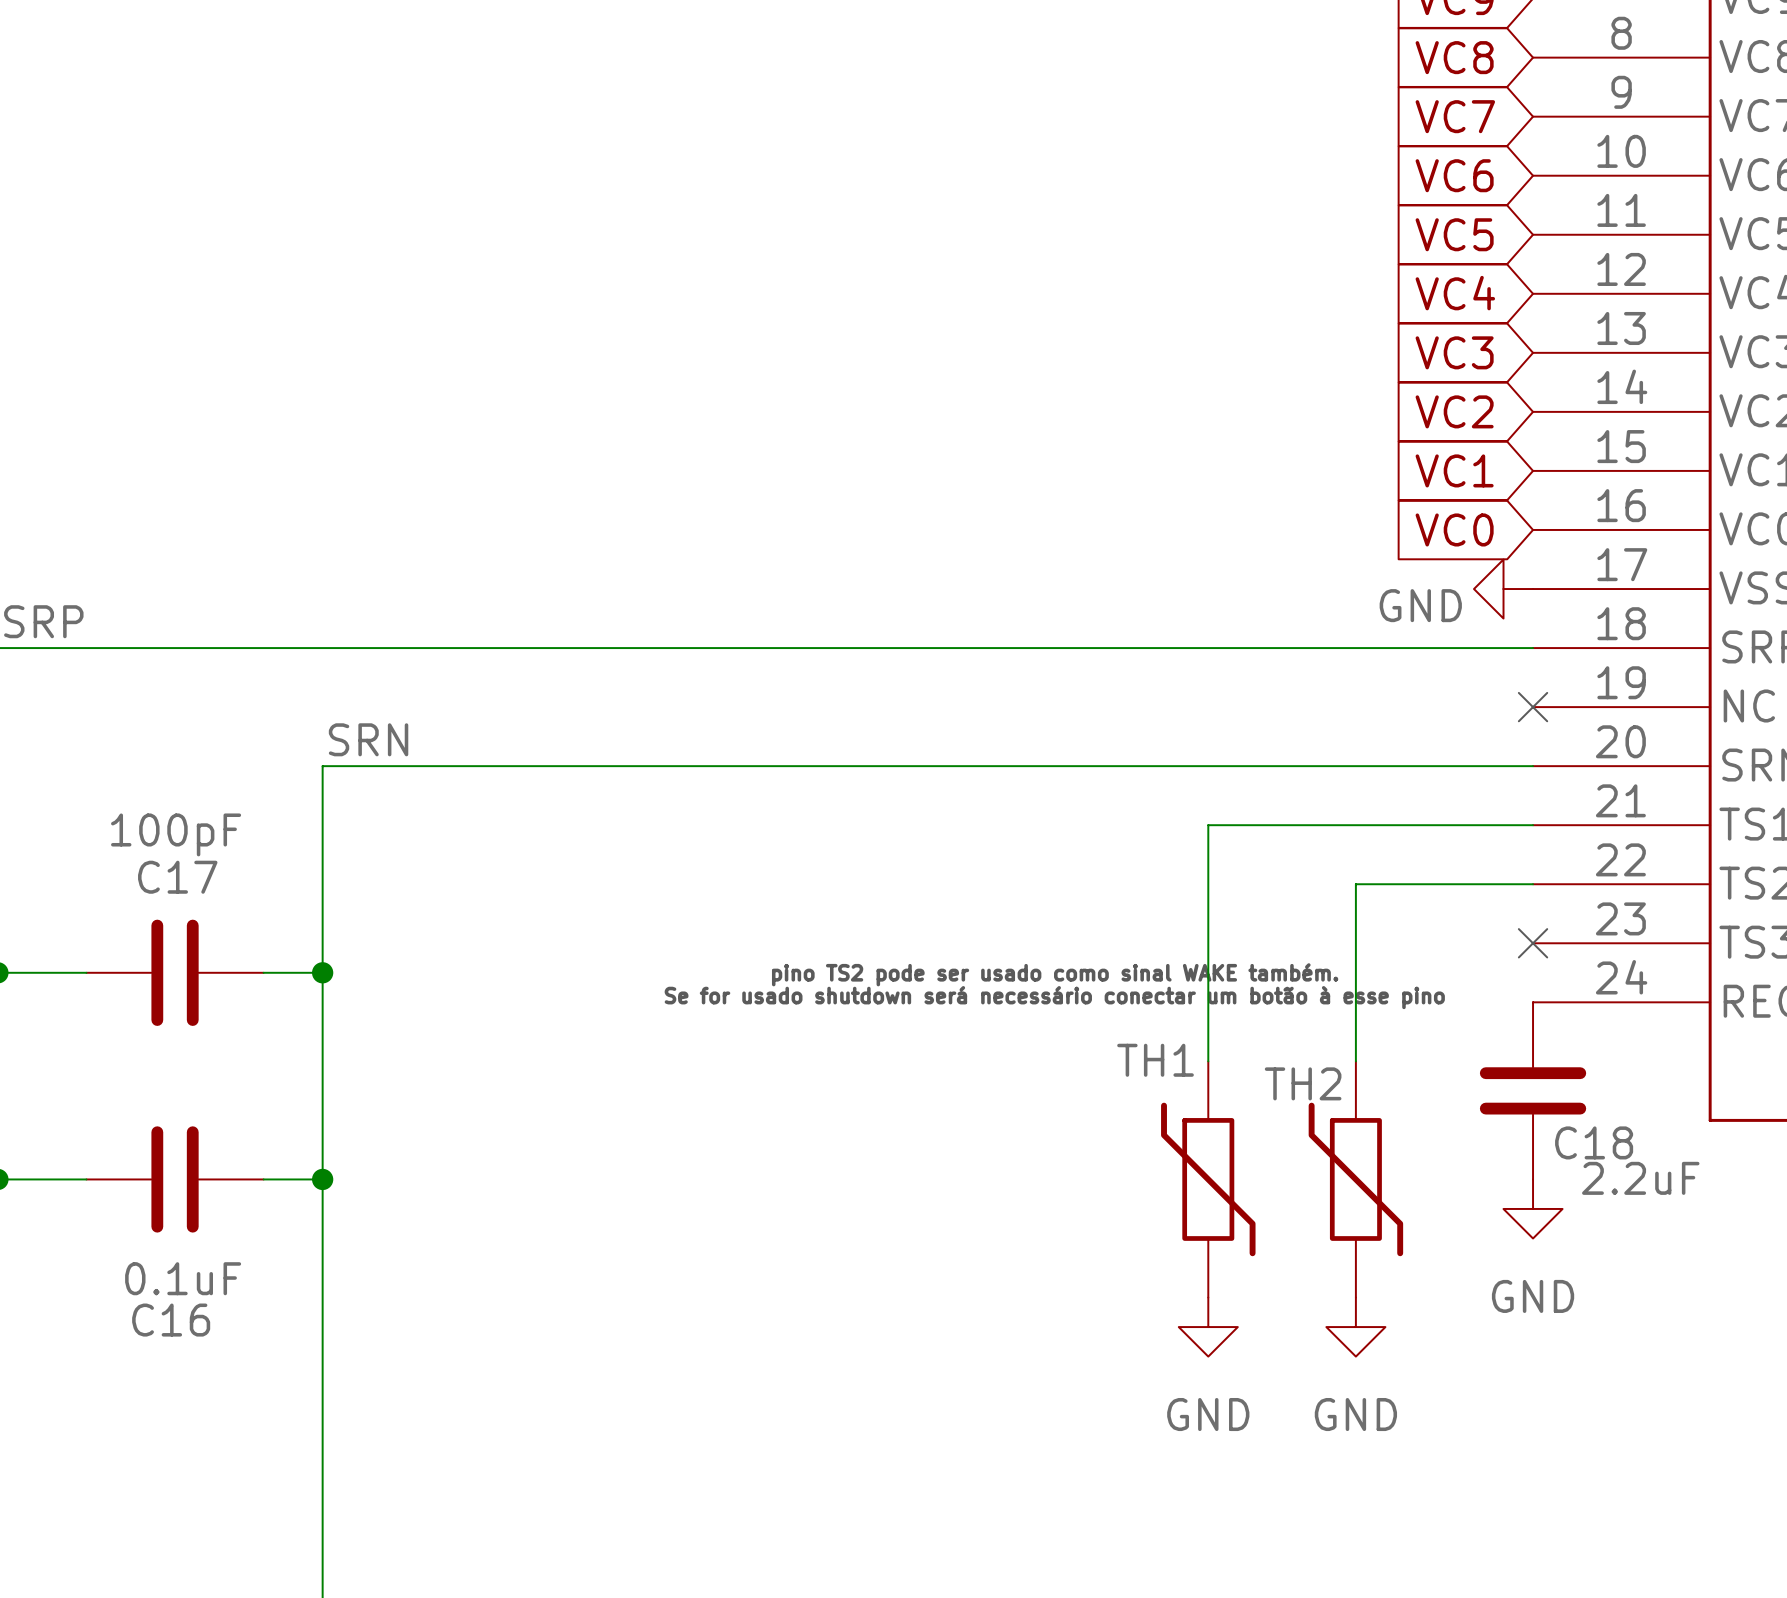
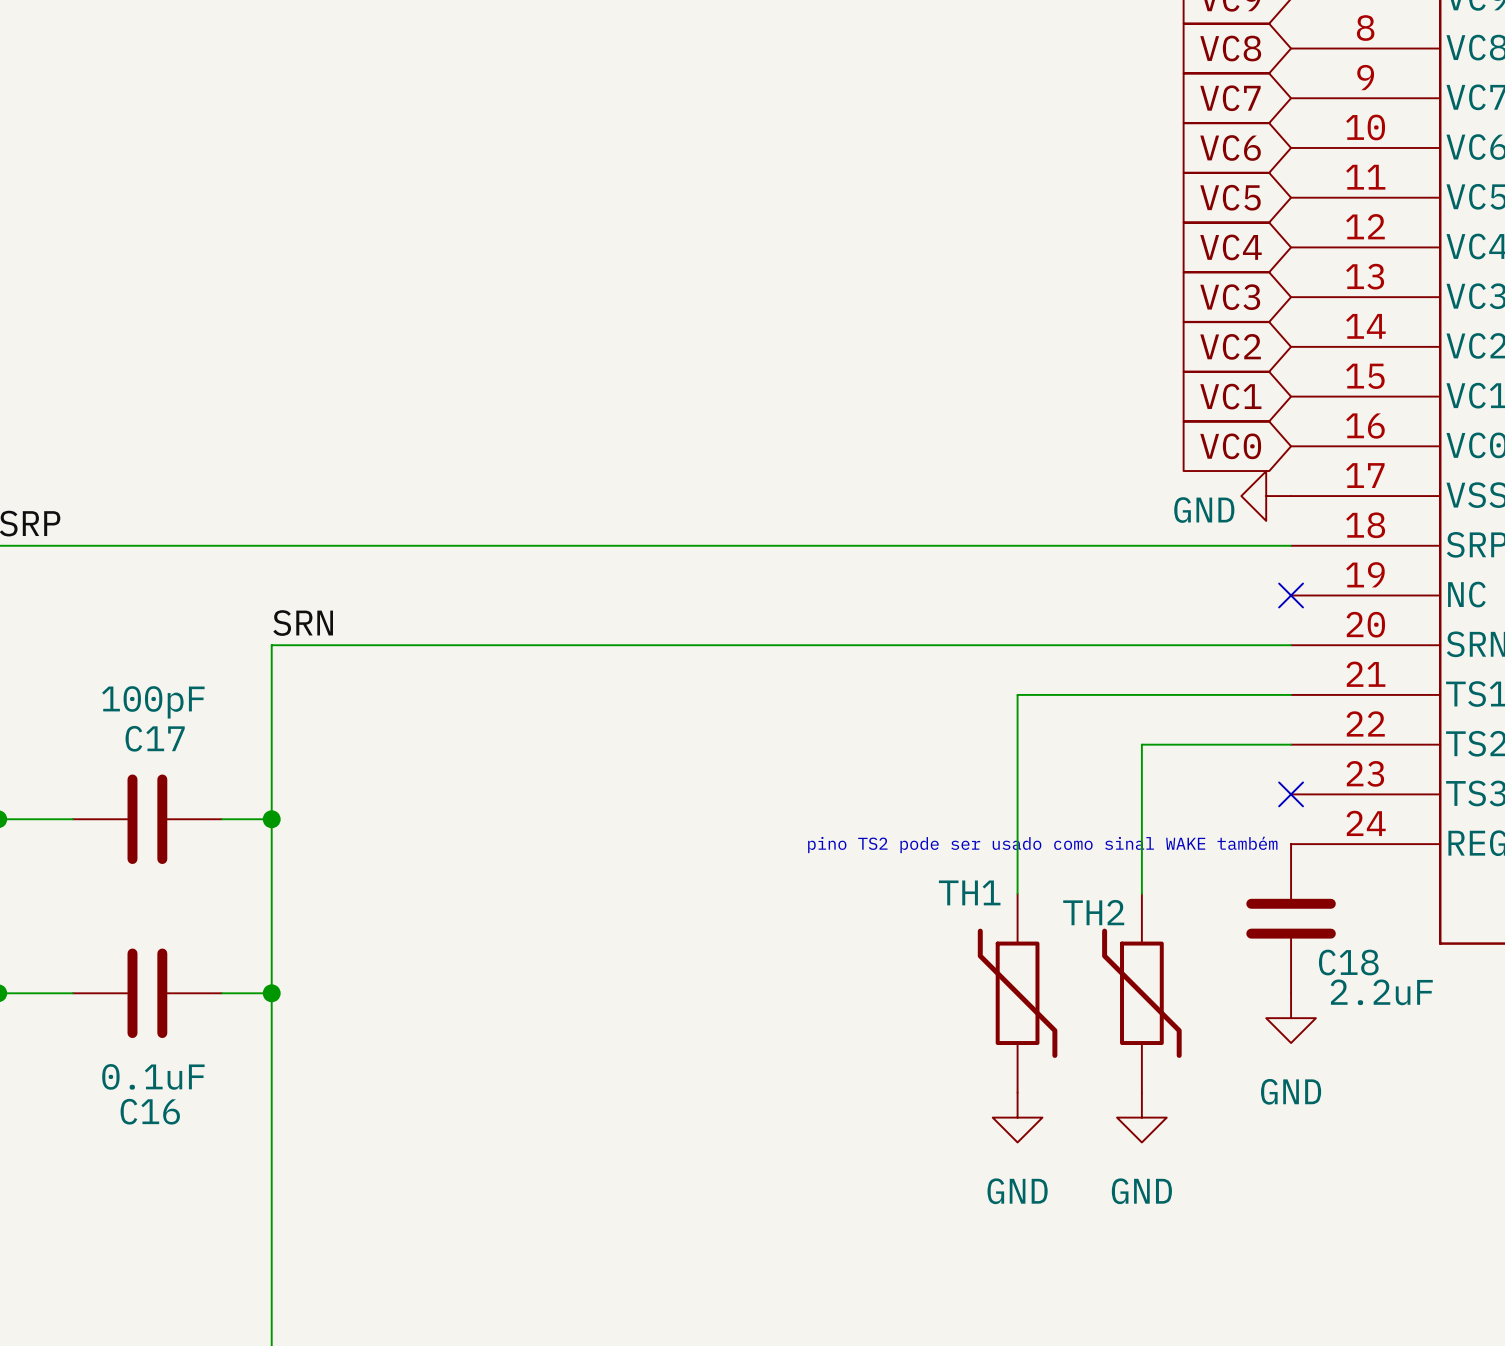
text: pino TS2 pode ser usado como sinal WAKE também. (1055, 974) -> pino TS2 pode ser usado como sinal WAKE também (1042, 844)
text: Se for usado shutdown será necessário conectar um botão à esse pino (1054, 997) -> none

